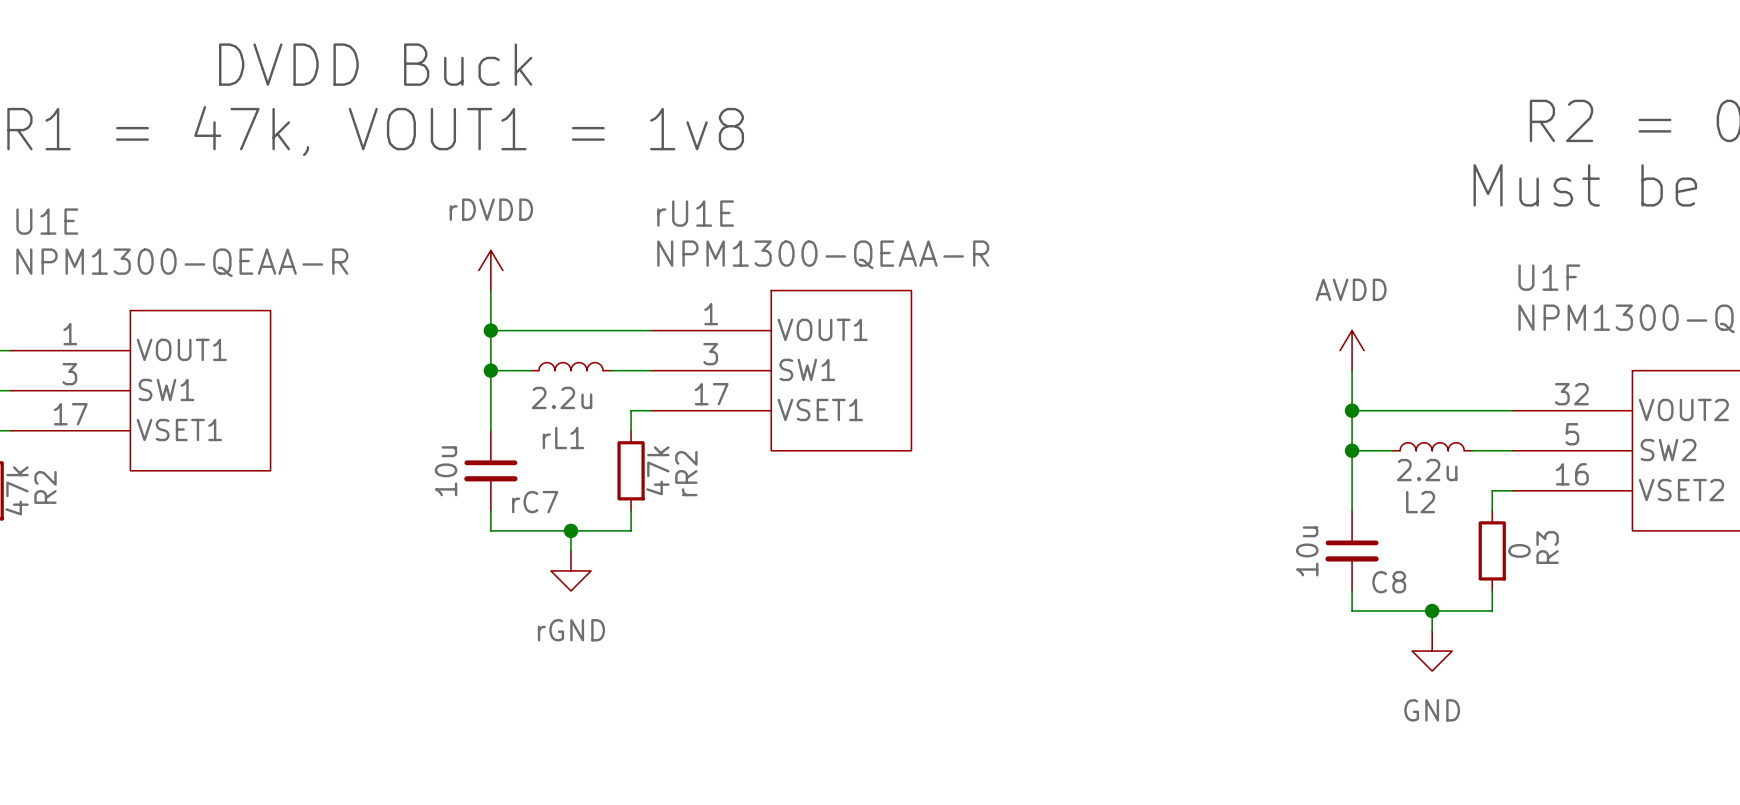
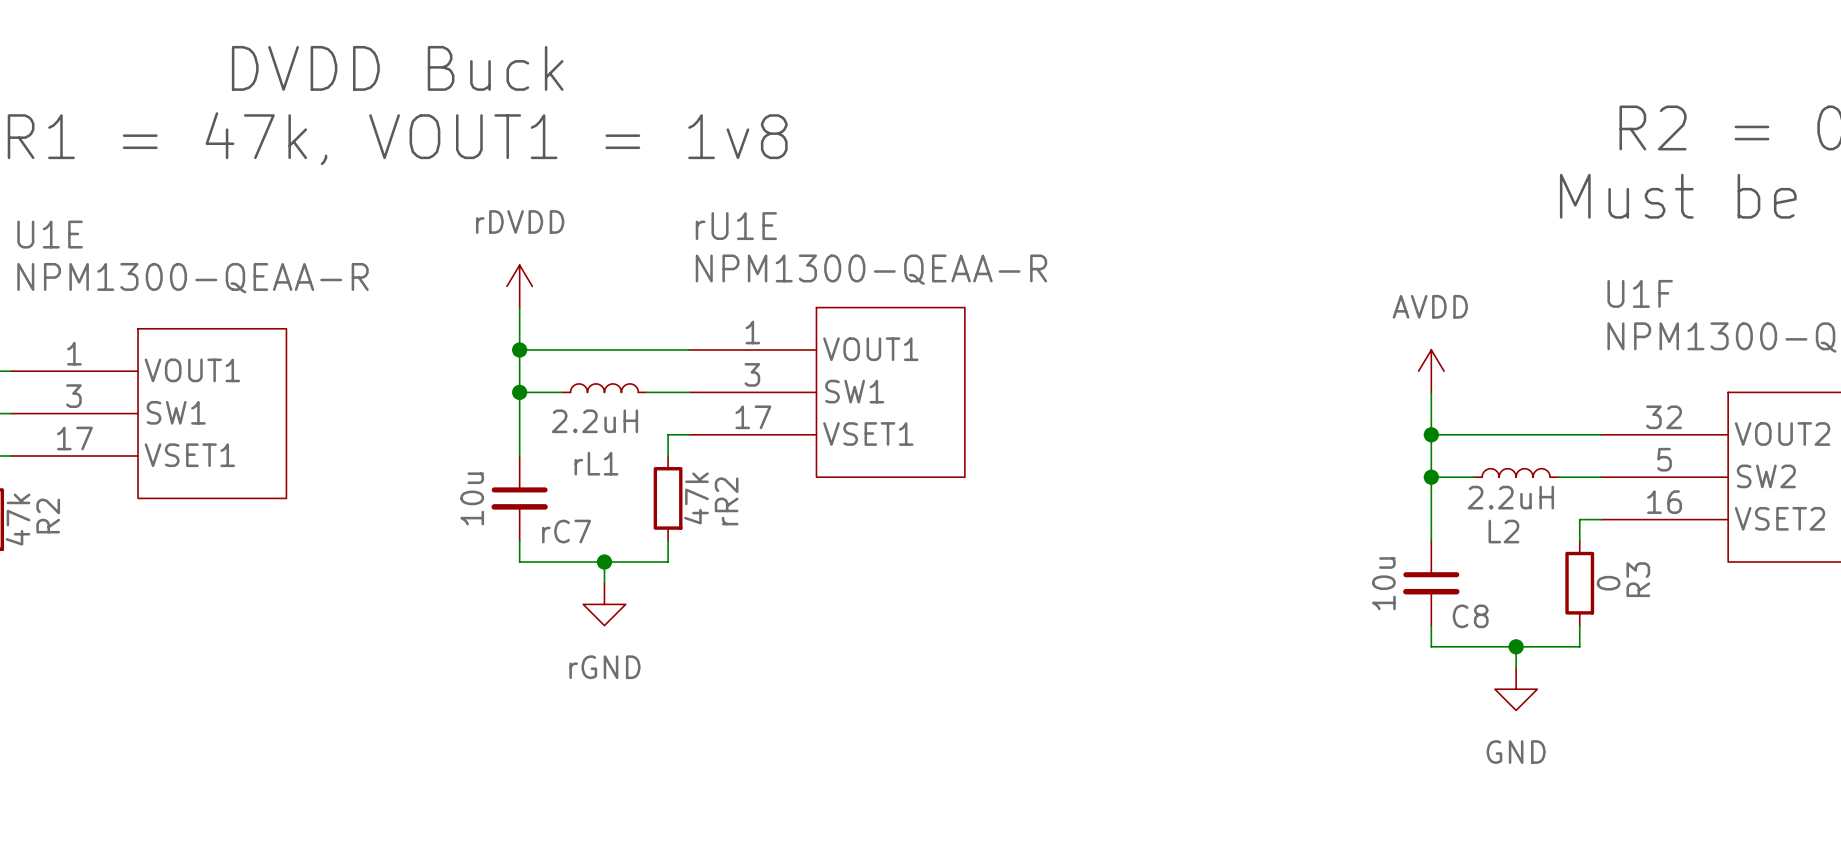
rL1 value: 2.2u (562, 397) -> 2.2uH (594, 421)
L2 value: 2.2u (1427, 470) -> 2.2uH (1510, 497)

